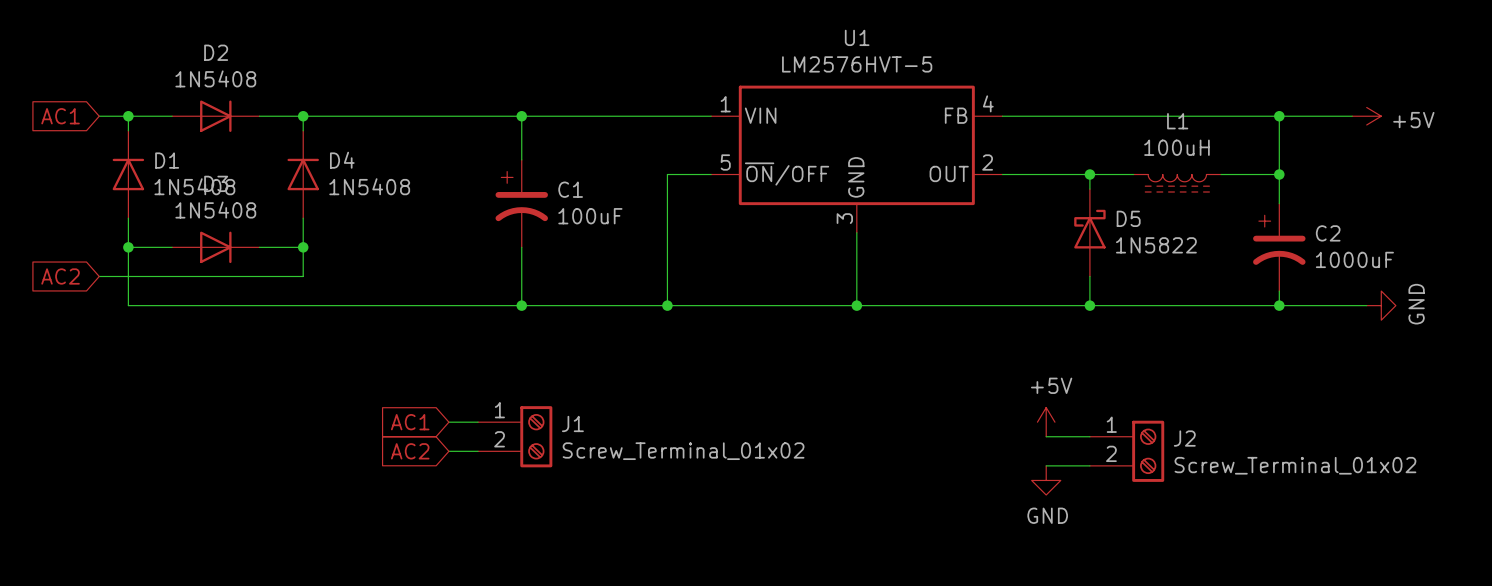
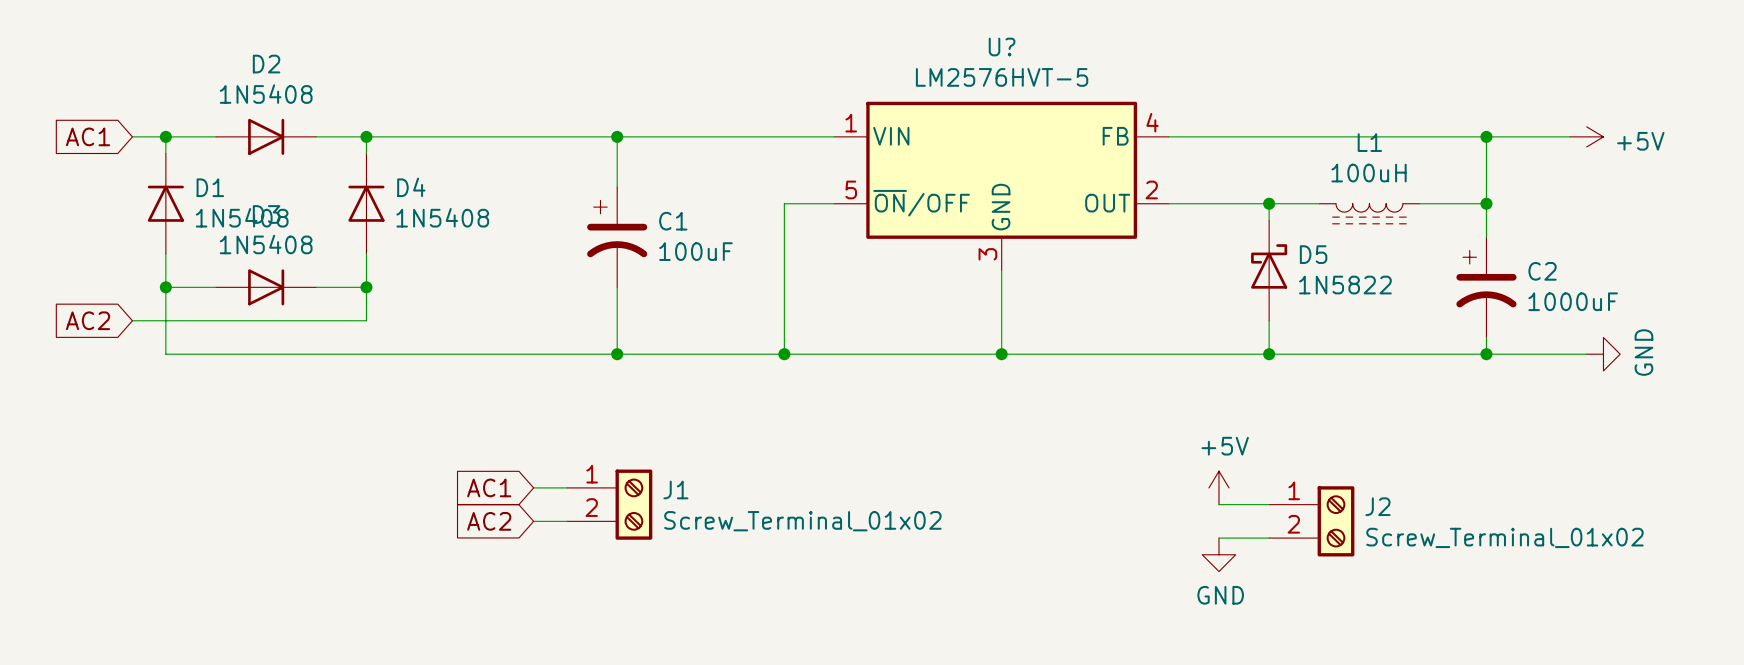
U1 name: U1 (857, 37) -> U? (1002, 46)

